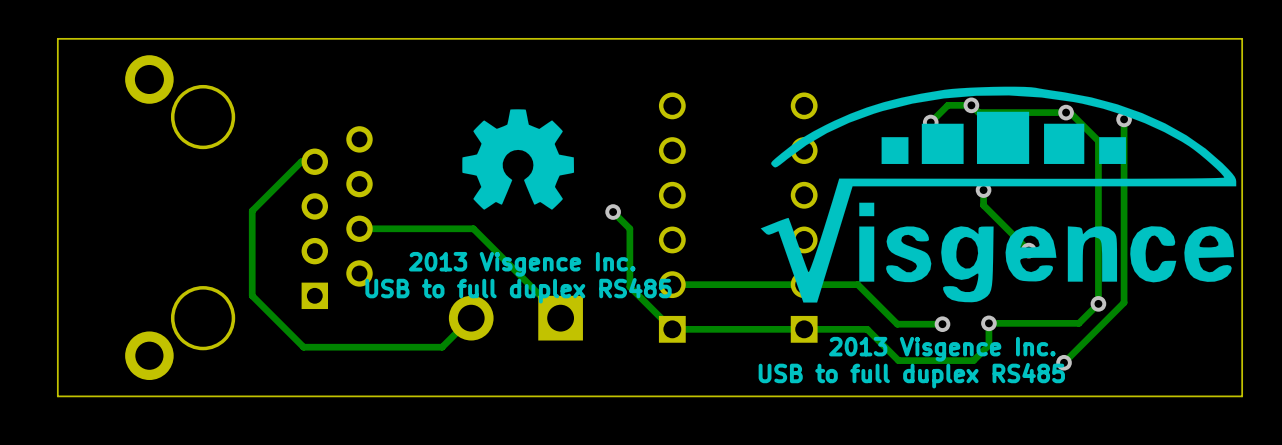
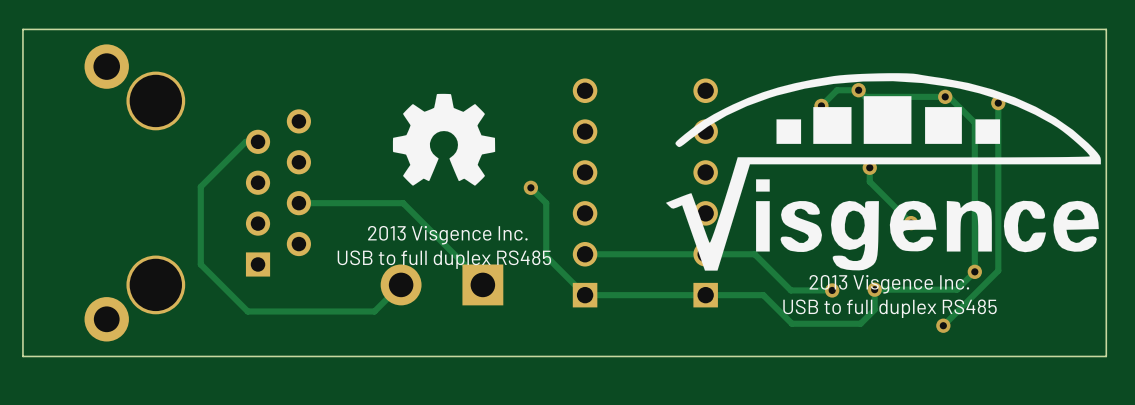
text position: 2013 Visgence Inc. (942, 349) -> 2013 Visgence Inc. (889, 284)
text position: USB to full duplex RS485 (911, 375) -> USB to full duplex RS485 (890, 308)

